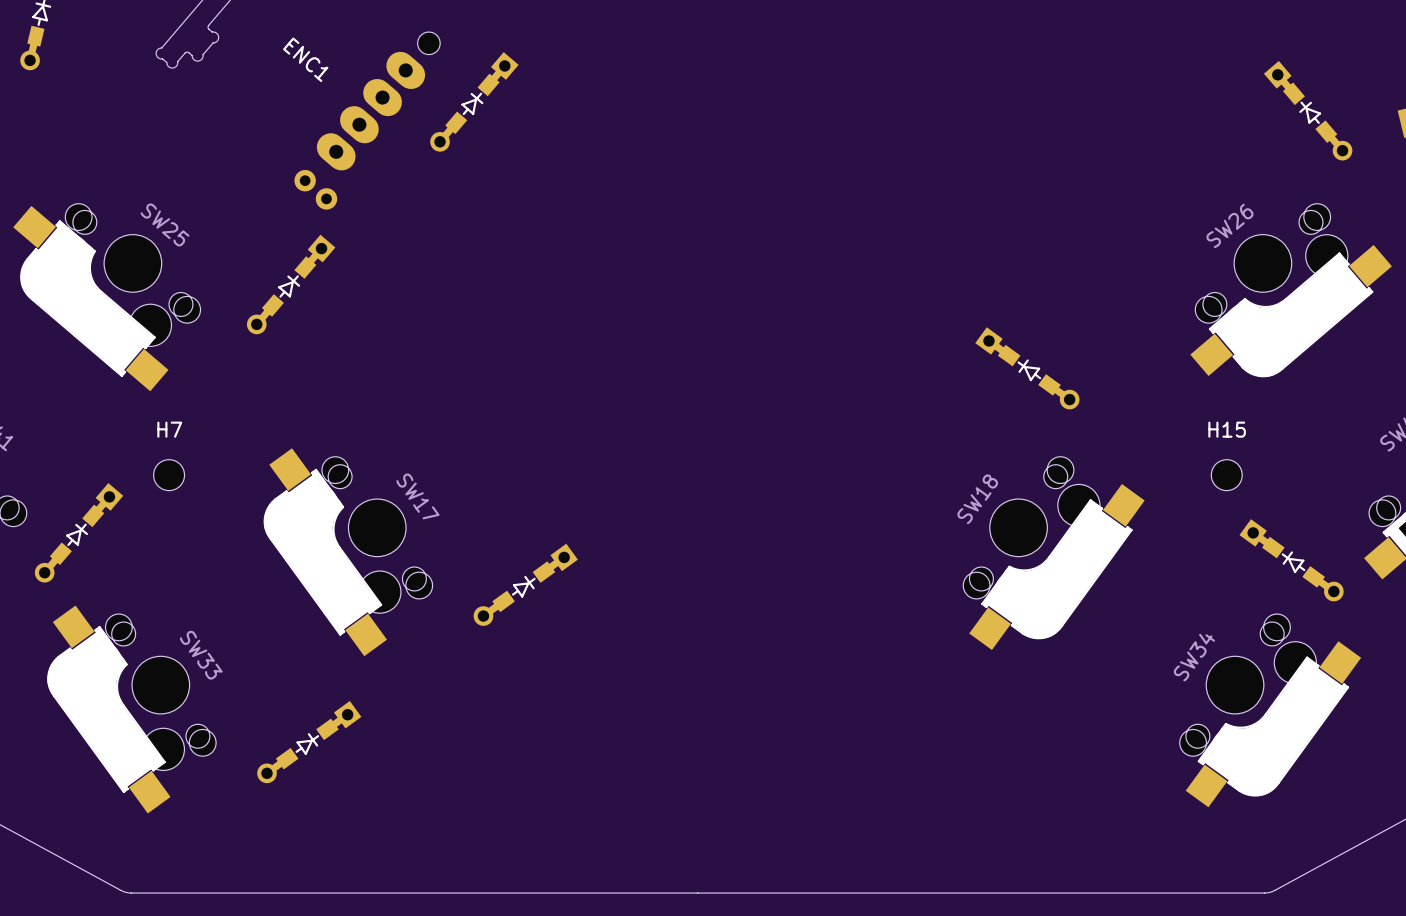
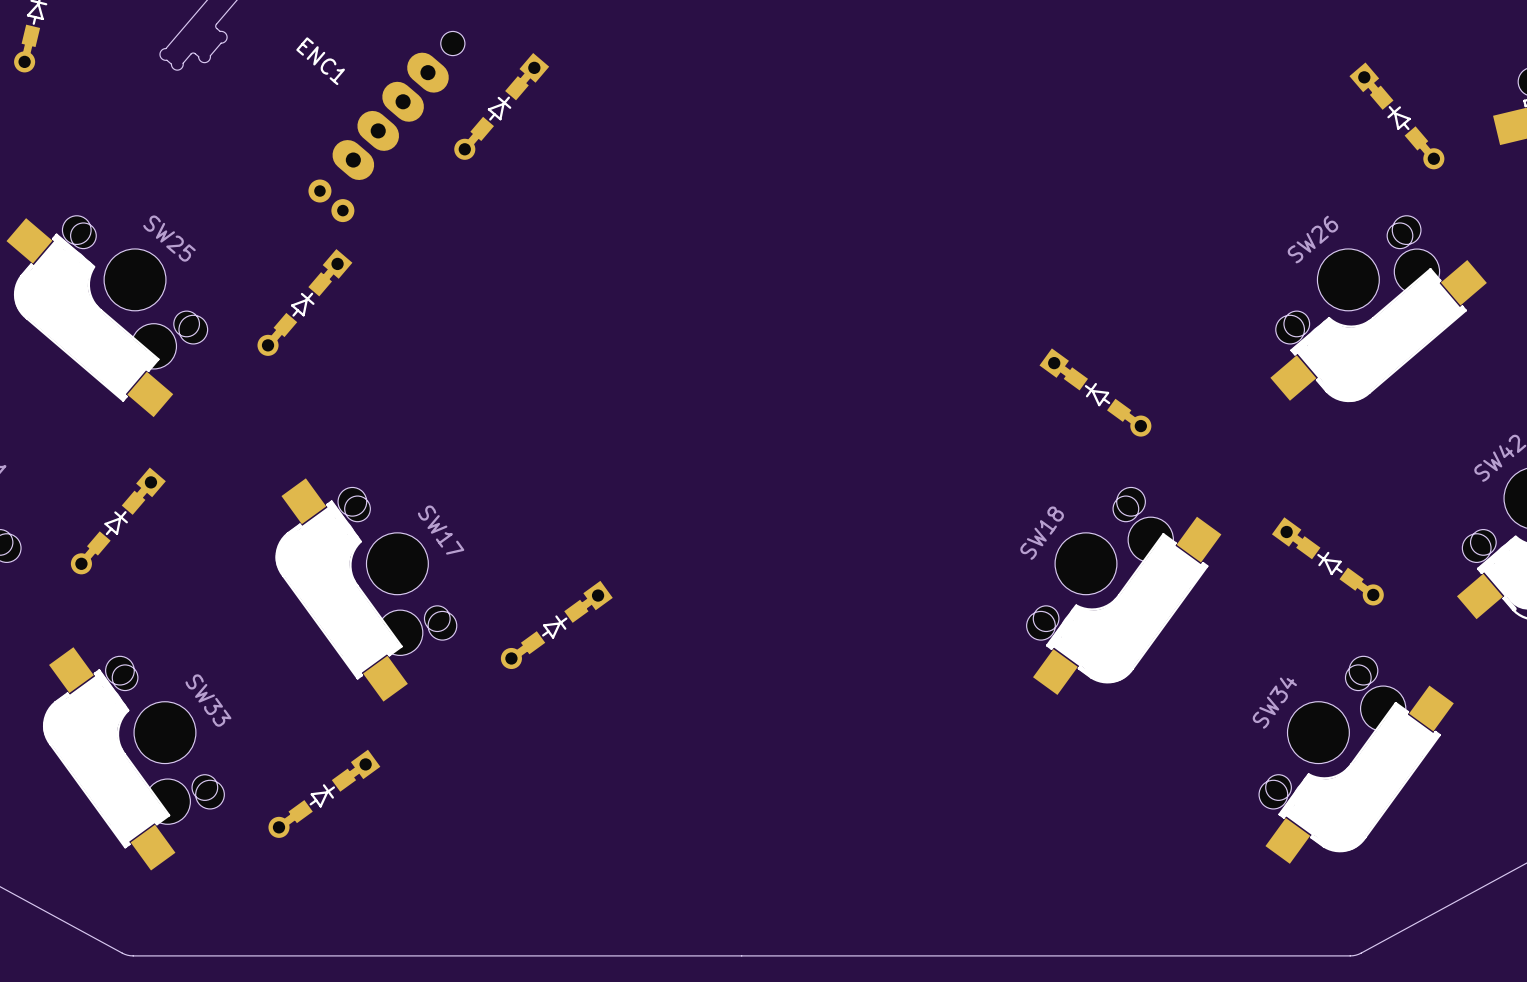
H7: (169, 475) -> none
H15: (1226, 475) -> none
part position: (79, 532) -> (118, 520)
part position: (1291, 560) -> (1327, 561)

